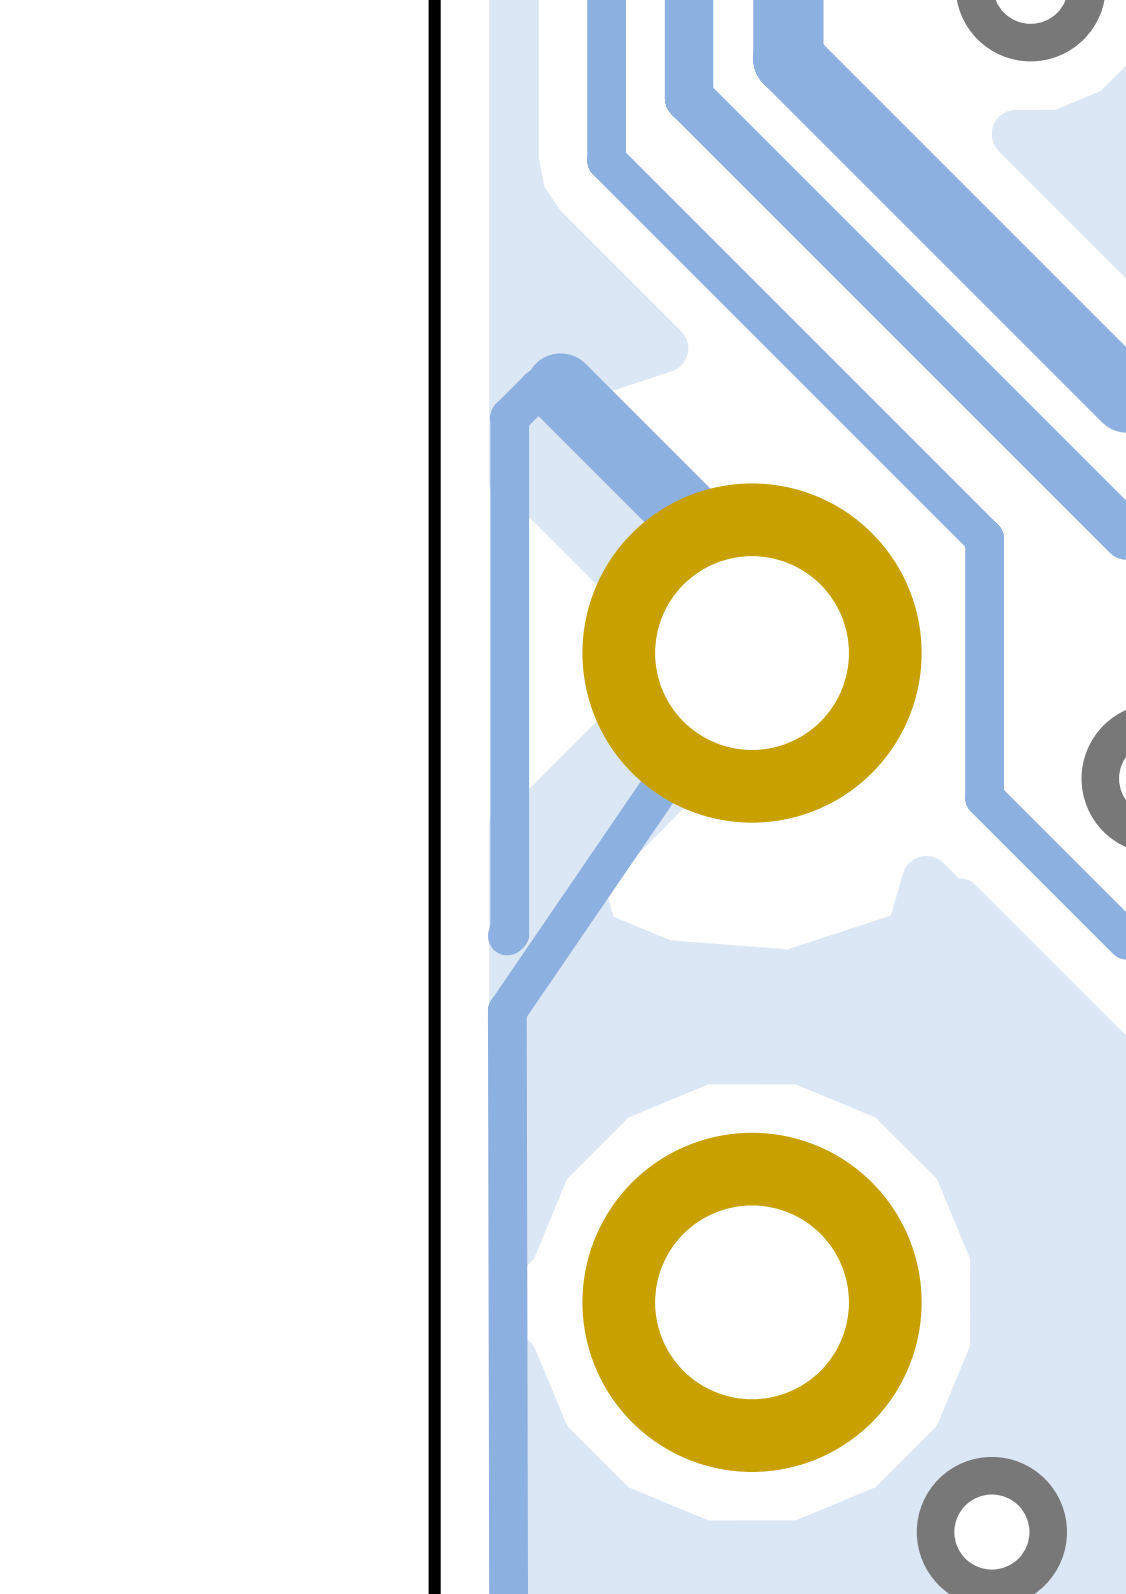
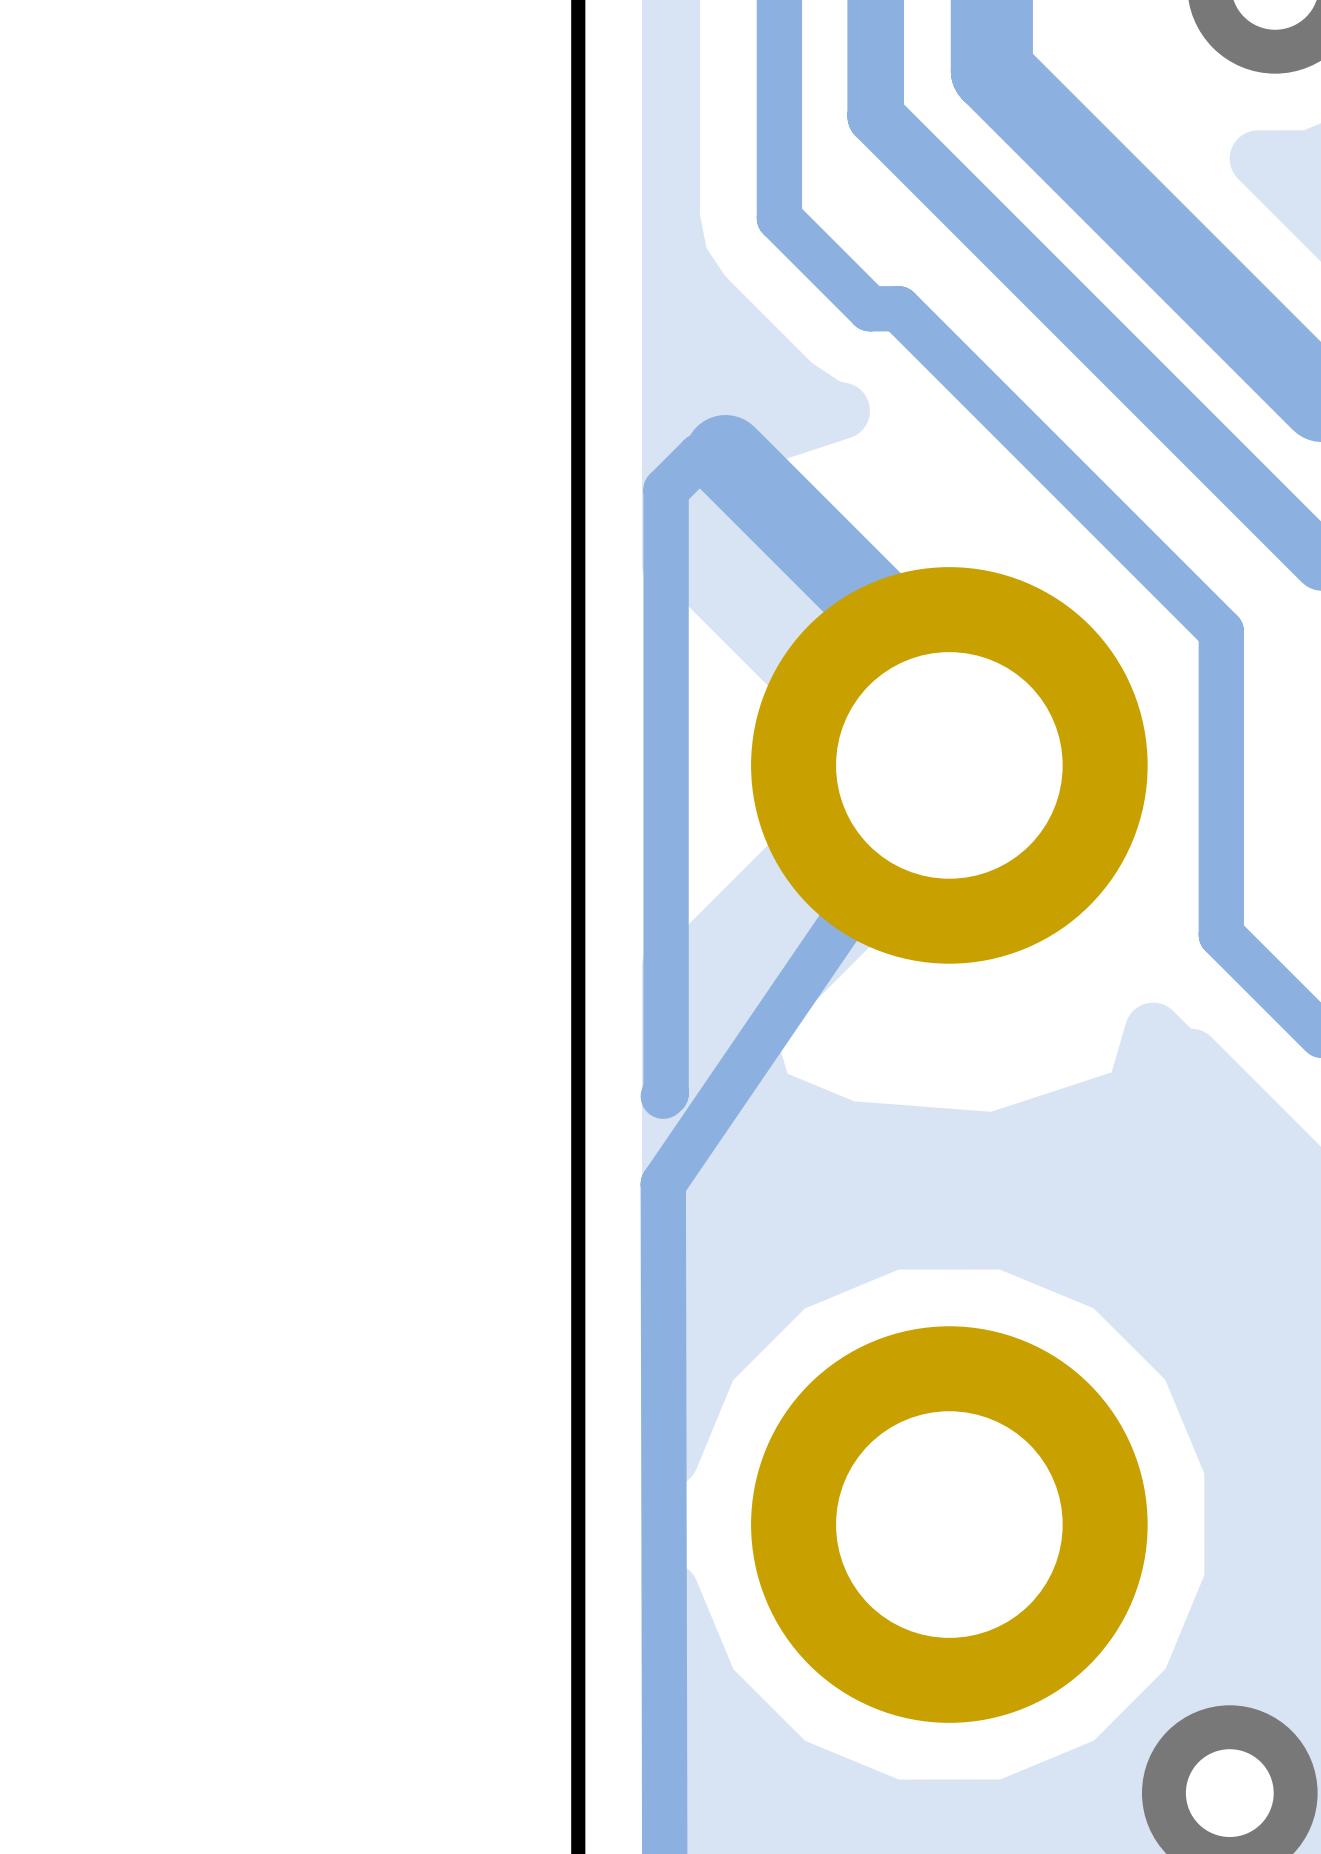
track: (606, 160) (708, 262) -> (779, 189) (779, 218) (870, 308) (898, 308)

